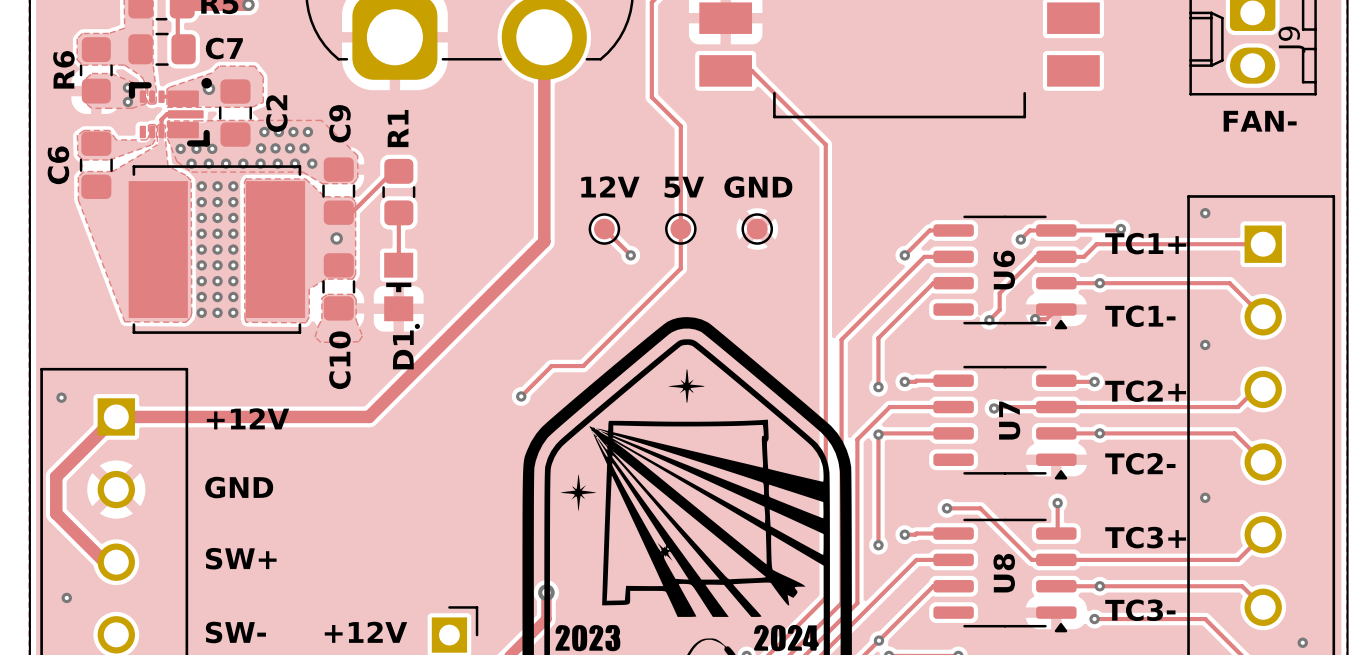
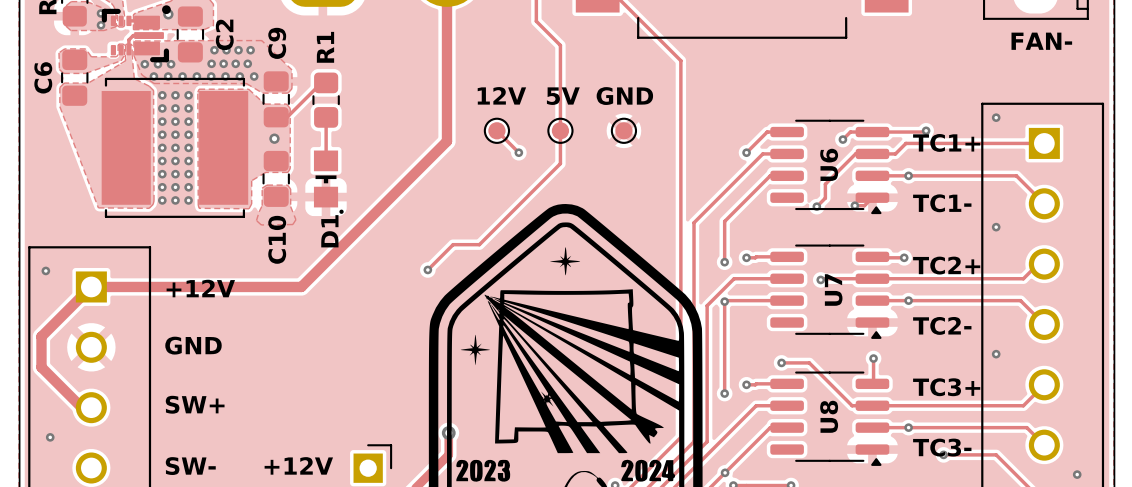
track: (1094, 619) (1142, 619) -> none
via position: (1094, 619) -> (943, 454)

